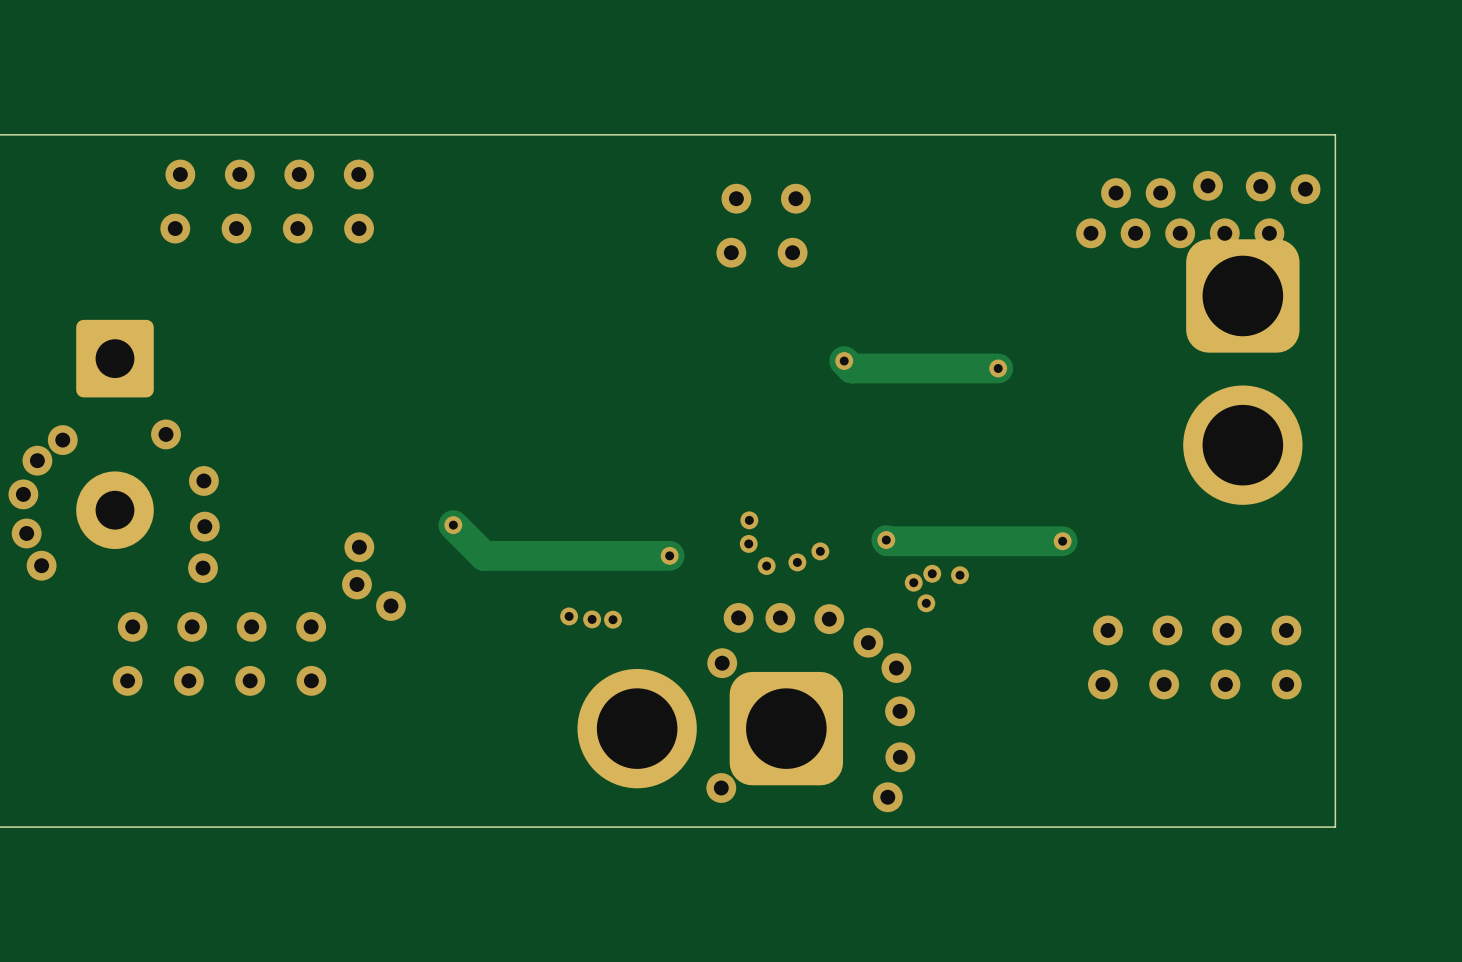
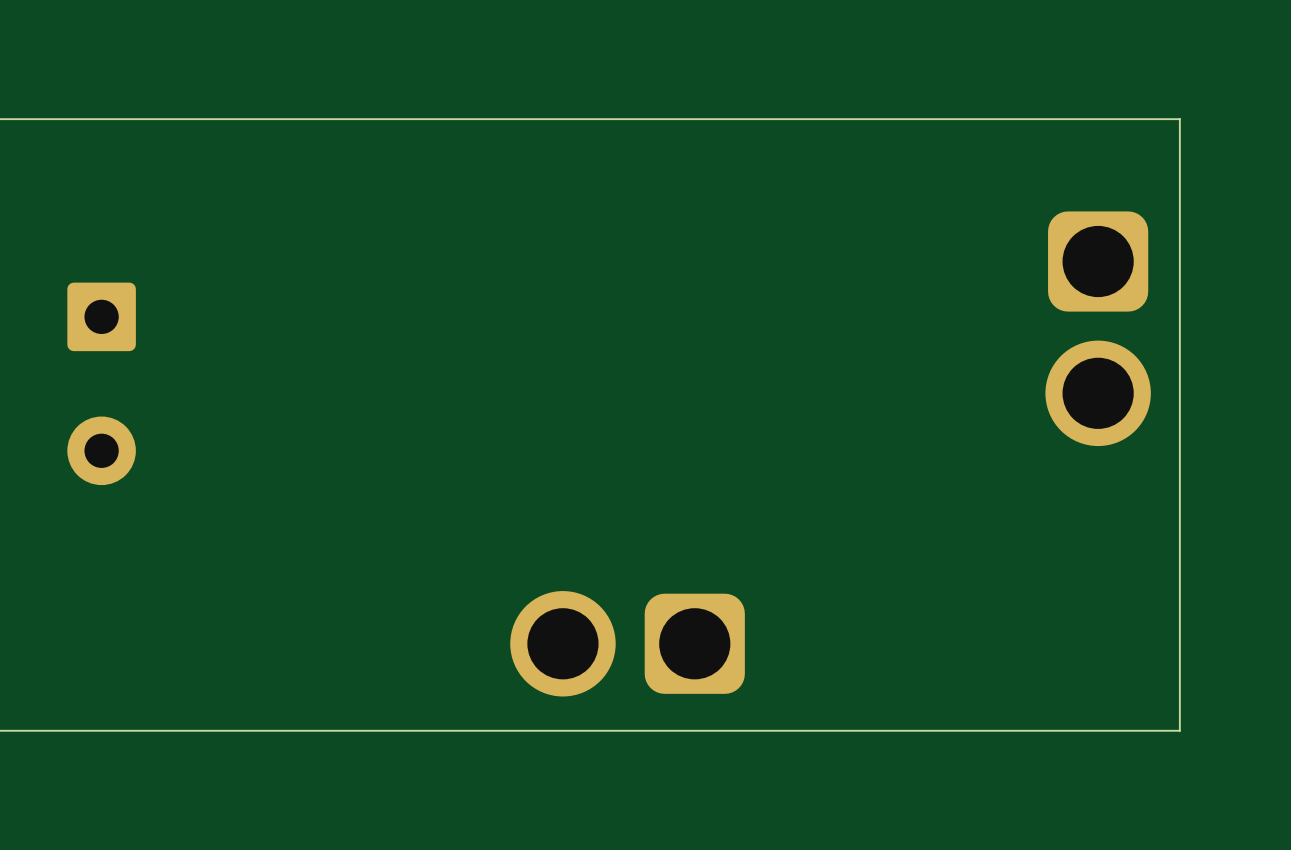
via: (180, 174) -> none
via: (239, 174) -> none
via: (299, 174) -> none
via: (358, 174) -> none
via: (1207, 185) -> none
via: (1260, 186) -> none
via: (1305, 189) -> none
via: (1116, 193) -> none
via: (1160, 193) -> none
via: (736, 198) -> none
via: (795, 198) -> none
via: (175, 228) -> none
via: (236, 228) -> none
via: (297, 228) -> none
via: (359, 228) -> none
via: (1090, 233) -> none
via: (1135, 233) -> none
via: (1180, 233) -> none
via: (1224, 233) -> none
via: (1269, 233) -> none
via: (731, 252) -> none
via: (792, 252) -> none
track: (844, 361) (851, 368) (998, 368) -> none
via: (844, 361) -> none
via: (998, 368) -> none
via: (166, 434) -> none
via: (62, 440) -> none
via: (37, 460) -> none
via: (203, 480) -> none
via: (23, 494) -> none
via: (749, 520) -> none
track: (453, 525) (484, 555) (669, 555) -> none
via: (453, 525) -> none
via: (204, 526) -> none
via: (26, 533) -> none
track: (886, 540) (1062, 541) -> none
via: (886, 540) -> none
via: (1062, 541) -> none
via: (748, 543) -> none
via: (359, 547) -> none
via: (820, 551) -> none
via: (669, 555) -> none
via: (797, 562) -> none
via: (41, 565) -> none
via: (766, 566) -> none
via: (203, 568) -> none
via: (932, 573) -> none
via: (959, 575) -> none
via: (913, 582) -> none
via: (356, 584) -> none
via: (926, 603) -> none
via: (390, 605) -> none
via: (569, 616) -> none
via: (738, 617) -> none
via: (780, 617) -> none
via: (592, 619) -> none
via: (612, 619) -> none
via: (829, 619) -> none
via: (132, 626) -> none
via: (192, 626) -> none
via: (251, 626) -> none
via: (311, 626) -> none
via: (1107, 630) -> none
via: (1167, 630) -> none
via: (1226, 630) -> none
via: (1286, 630) -> none
via: (868, 642) -> none
via: (722, 663) -> none
via: (896, 668) -> none
via: (127, 680) -> none
via: (188, 680) -> none
via: (250, 680) -> none
via: (311, 680) -> none
via: (1102, 684) -> none
via: (1164, 684) -> none
via: (1225, 684) -> none
via: (1286, 684) -> none
via: (900, 711) -> none
via: (900, 757) -> none
via: (721, 787) -> none
via: (887, 797) -> none

